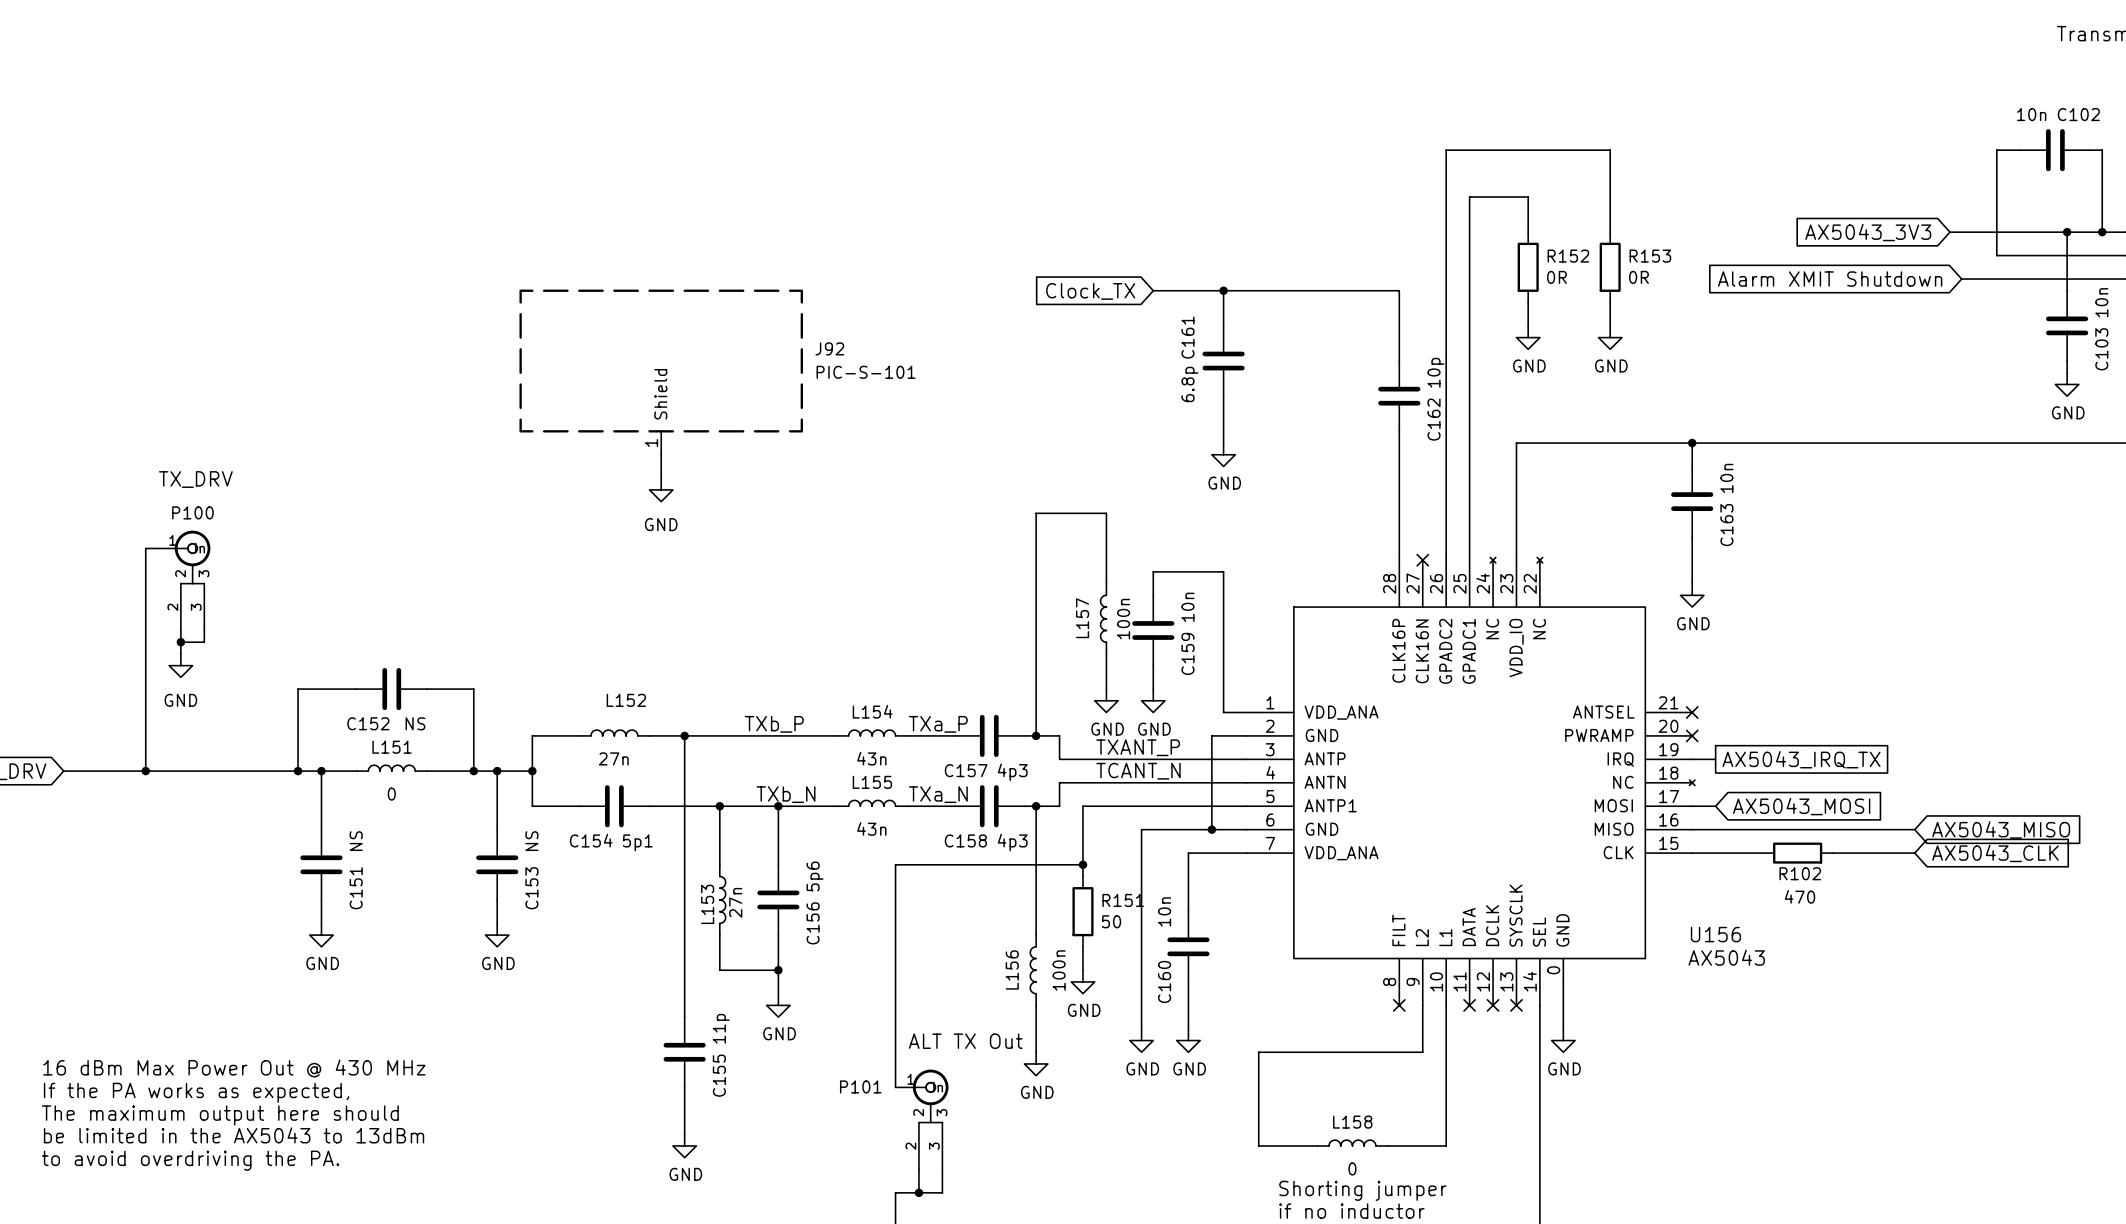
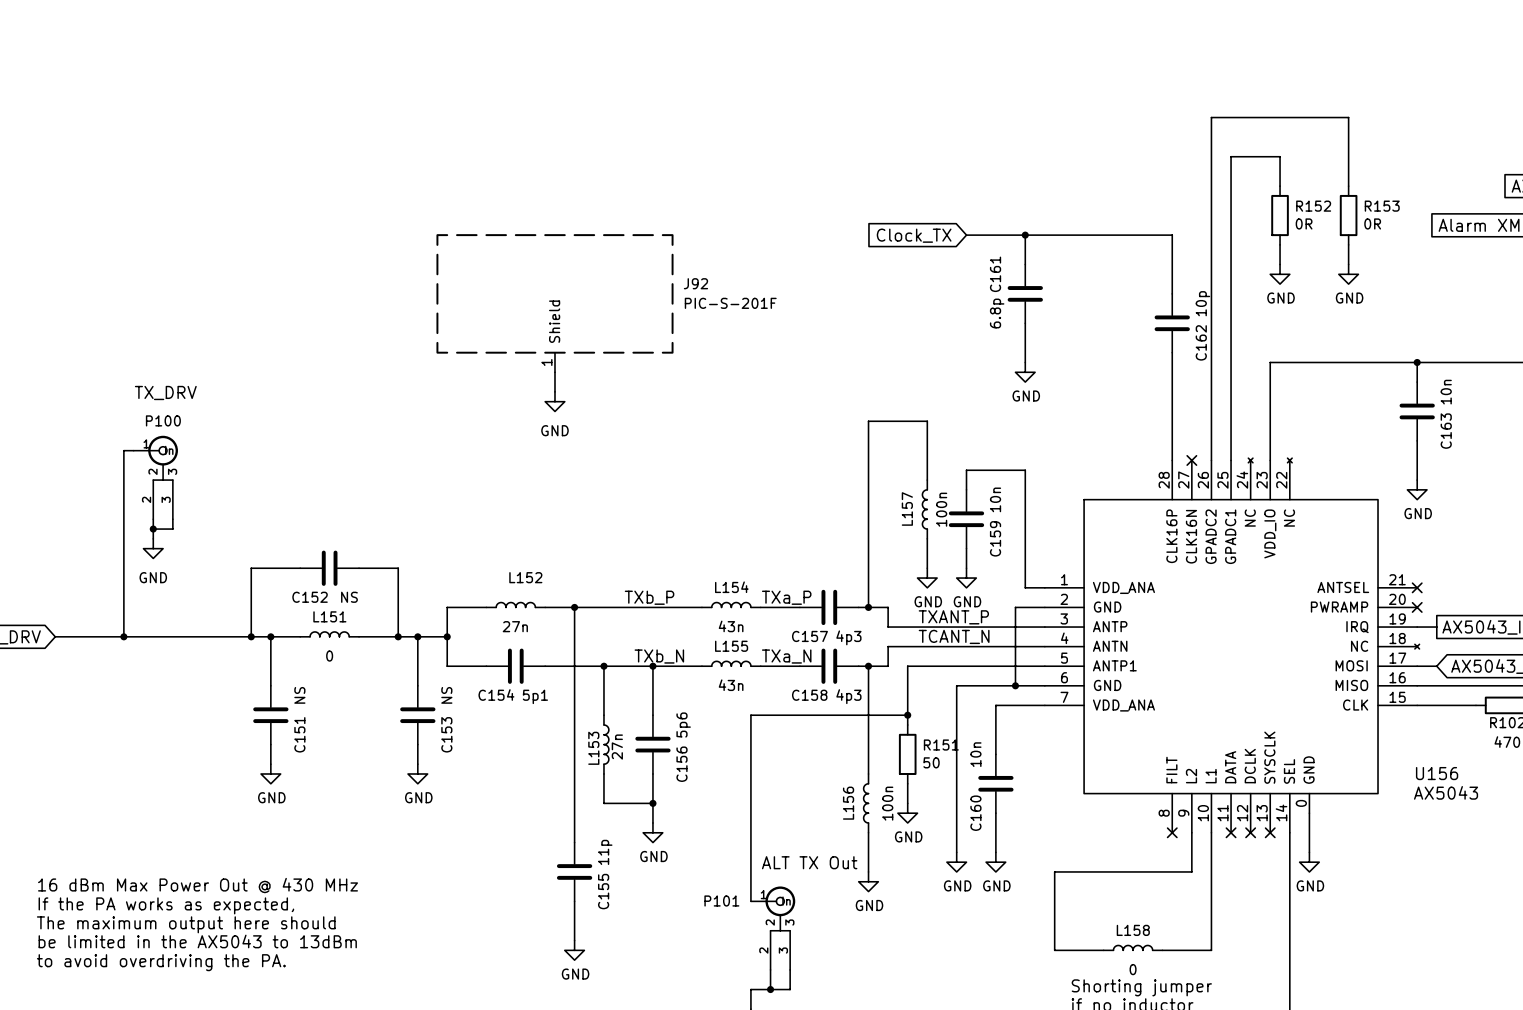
J92 value: PIC-S-101 (866, 372) -> PIC-S-201F (730, 303)

